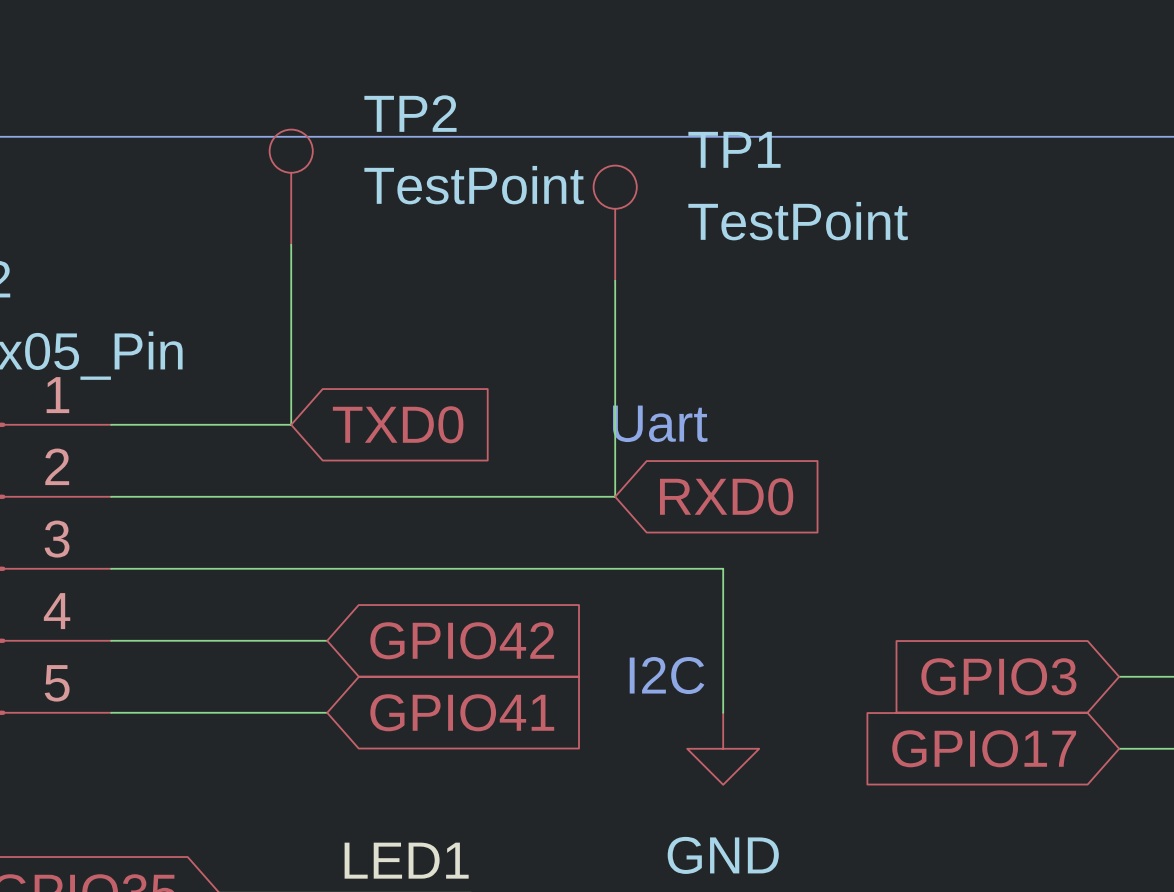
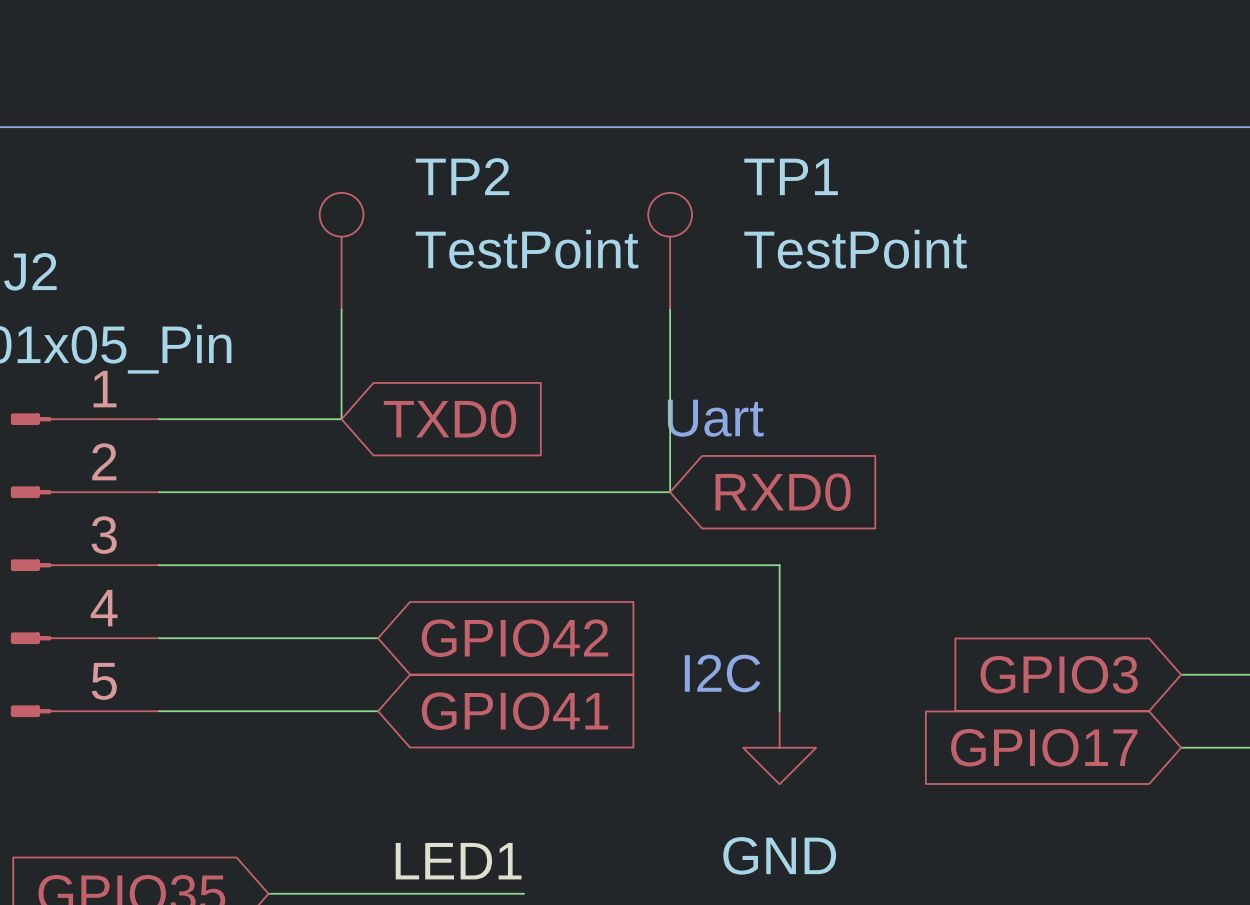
TP2 position: (291, 187) -> (341, 251)
TP1 position: (615, 223) -> (670, 251)

